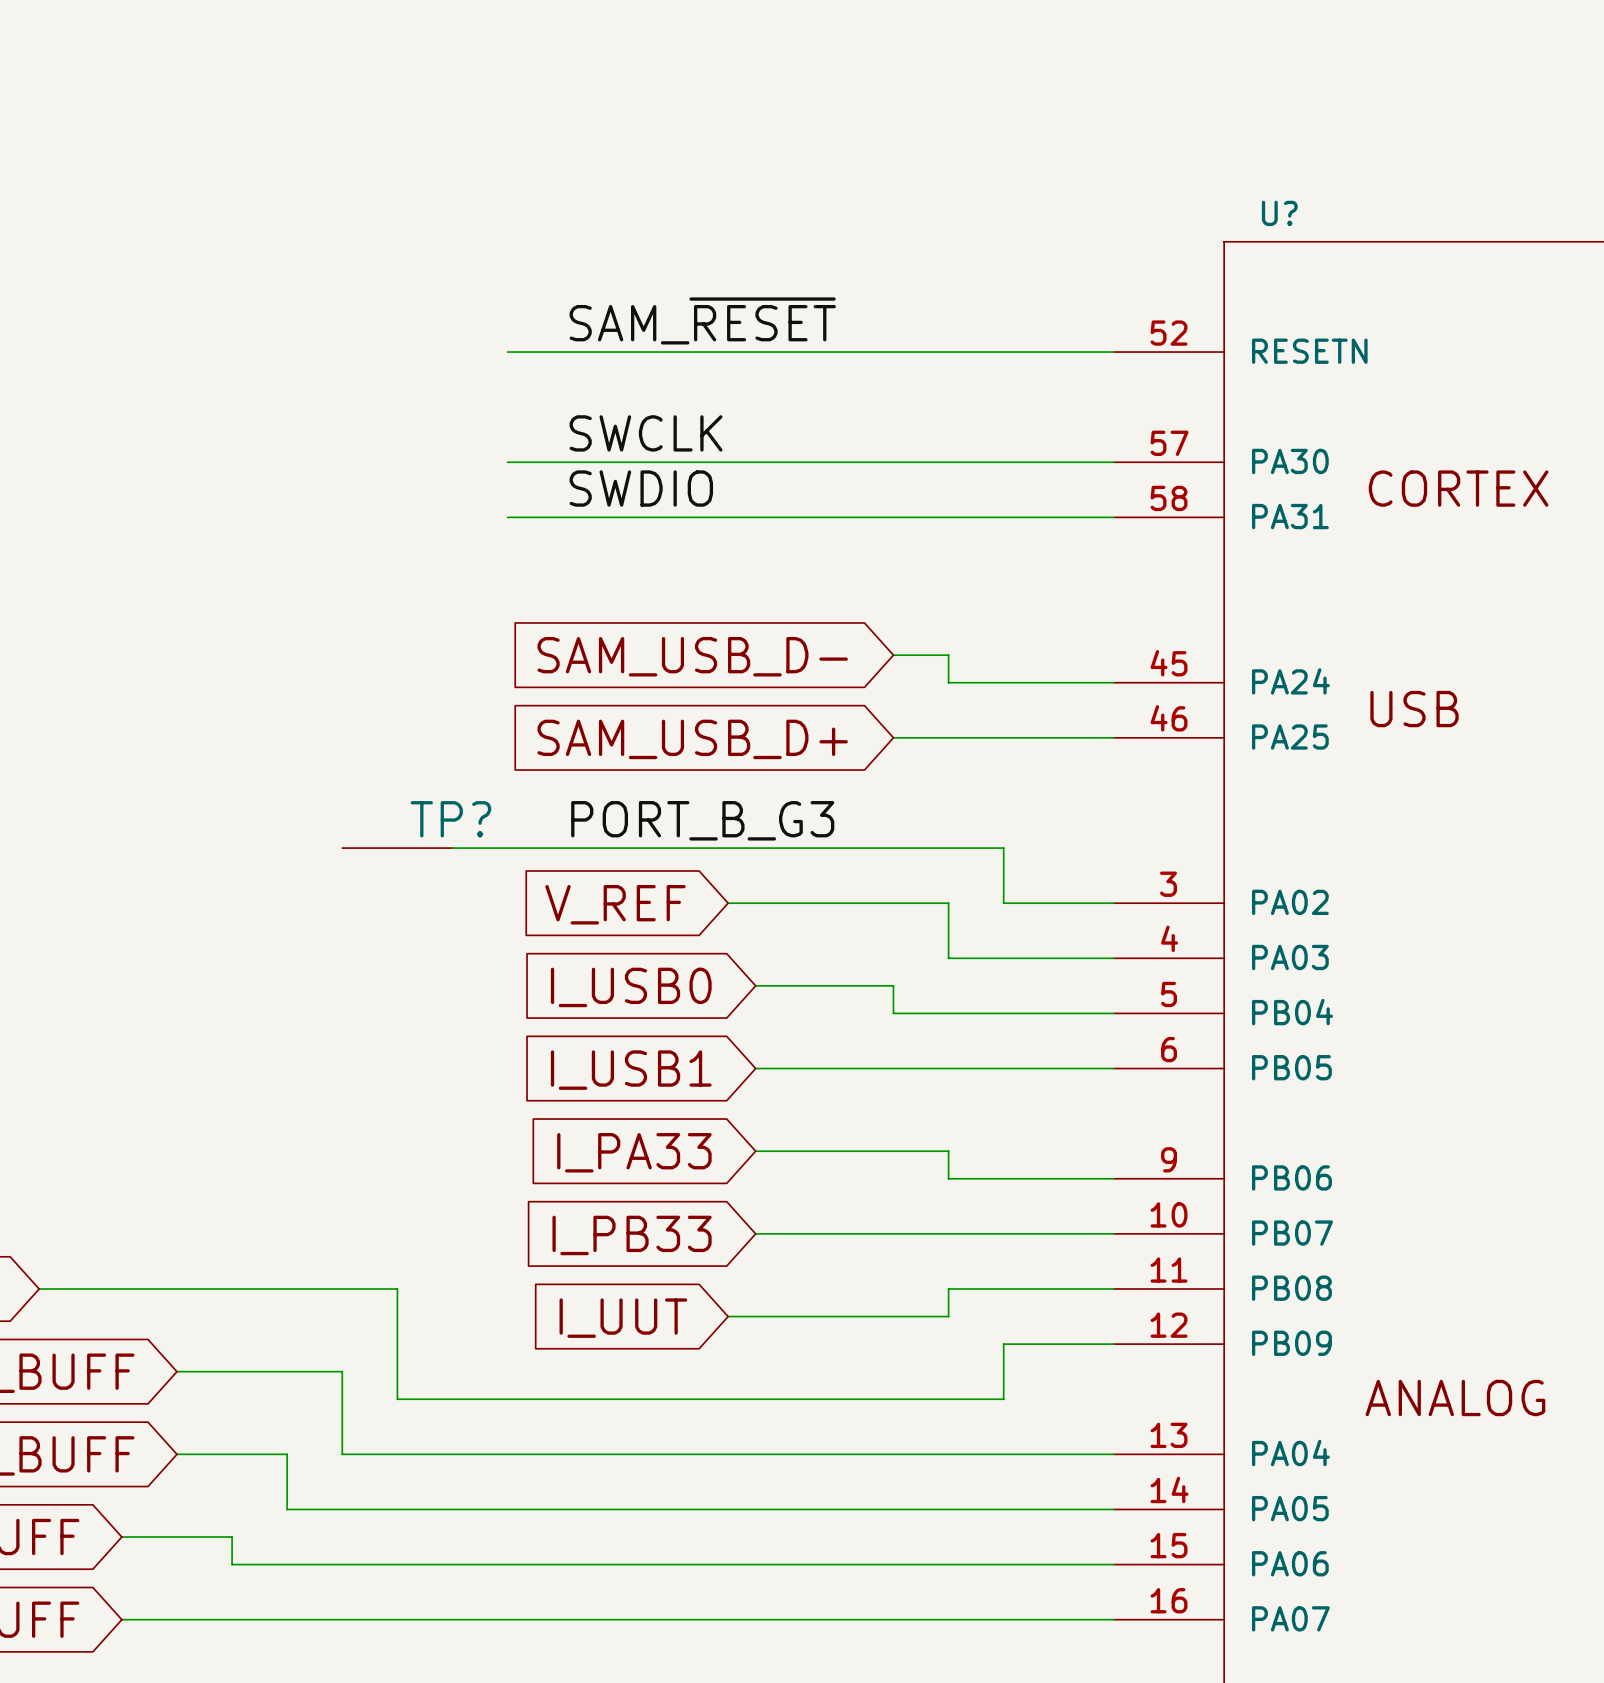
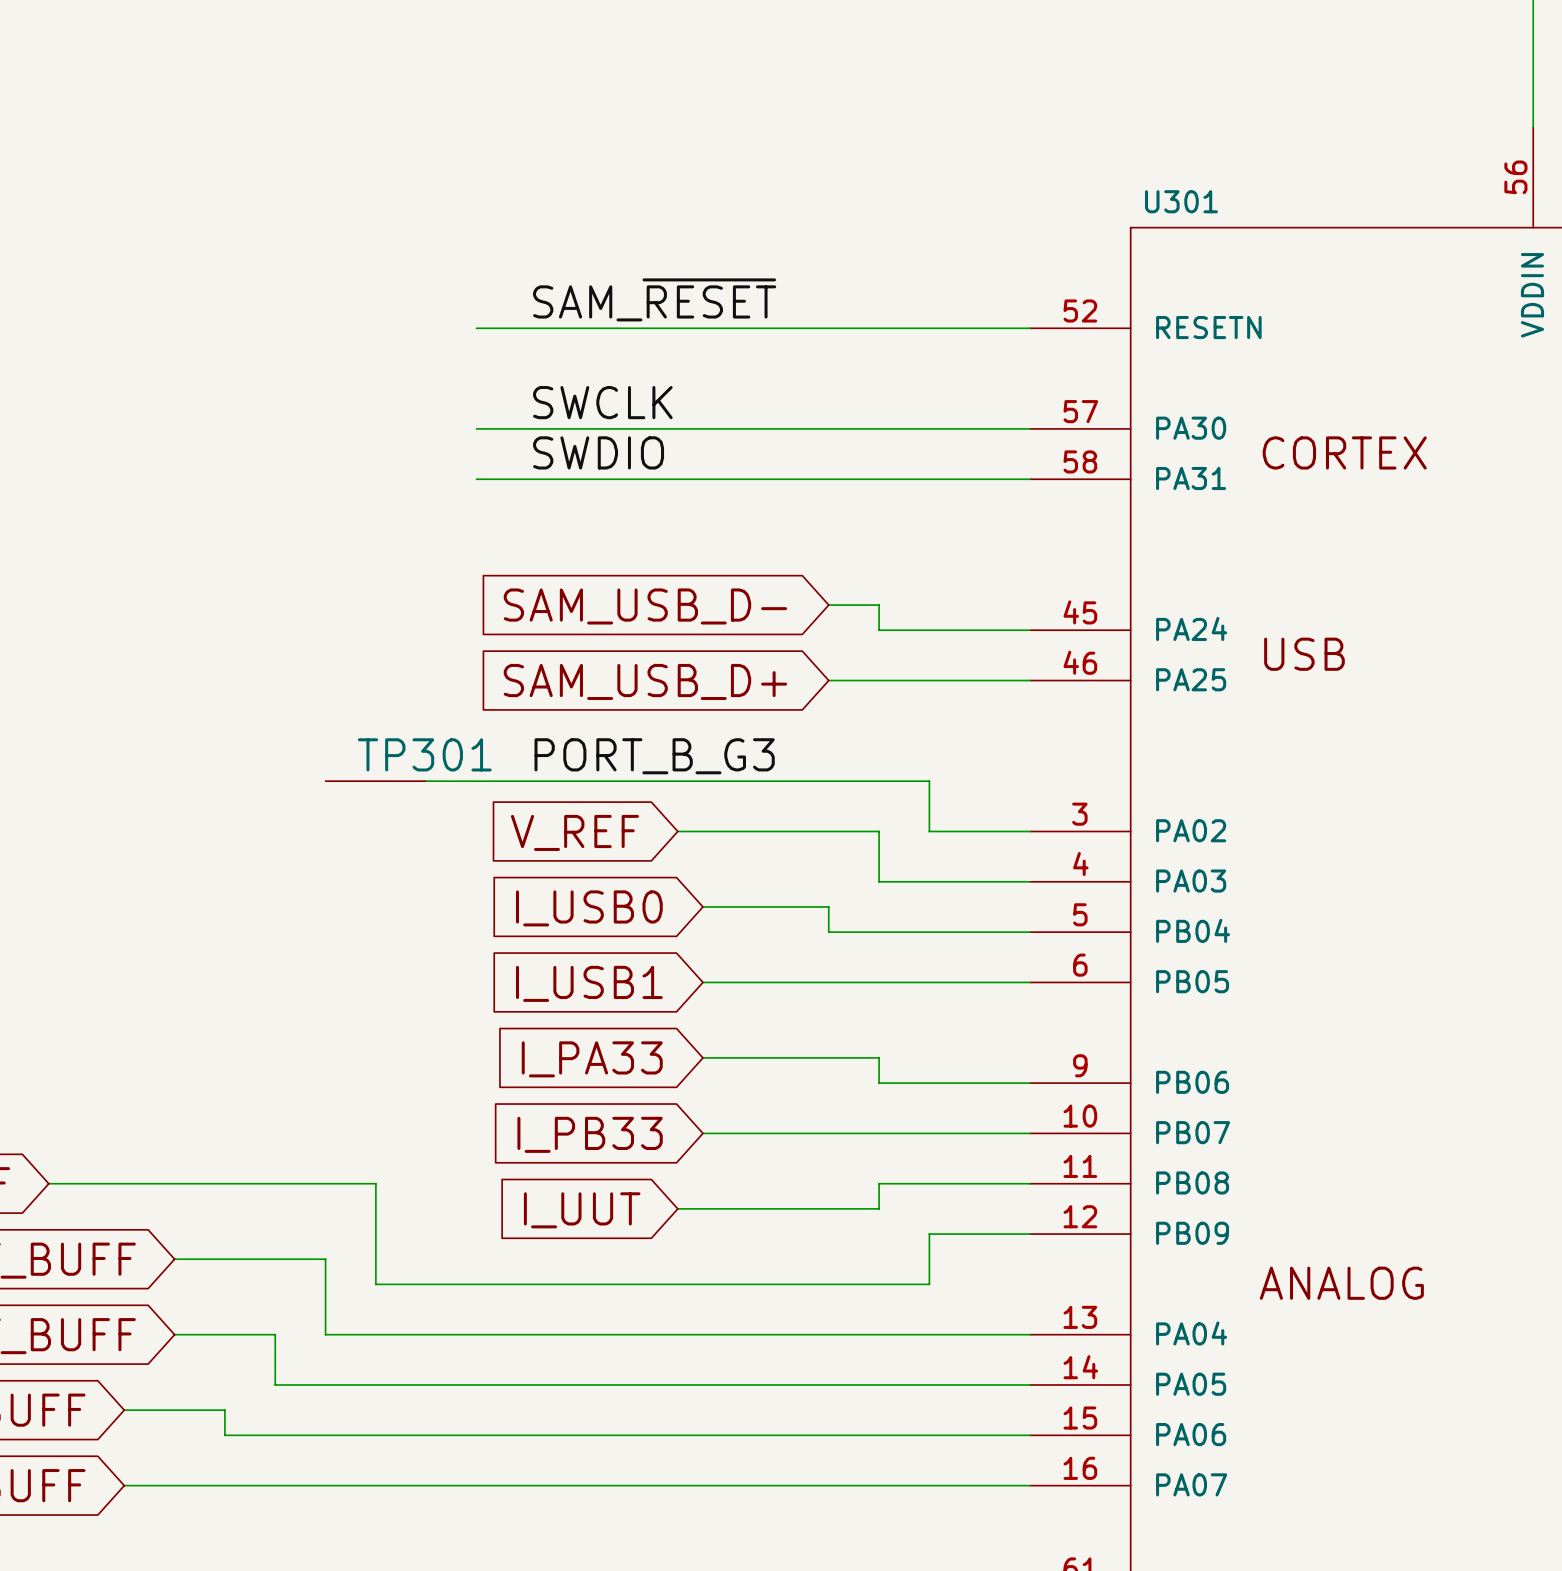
U? name: U? (1279, 213) -> U301 (1181, 201)
TP? name: TP? (450, 819) -> TP301 (424, 754)

